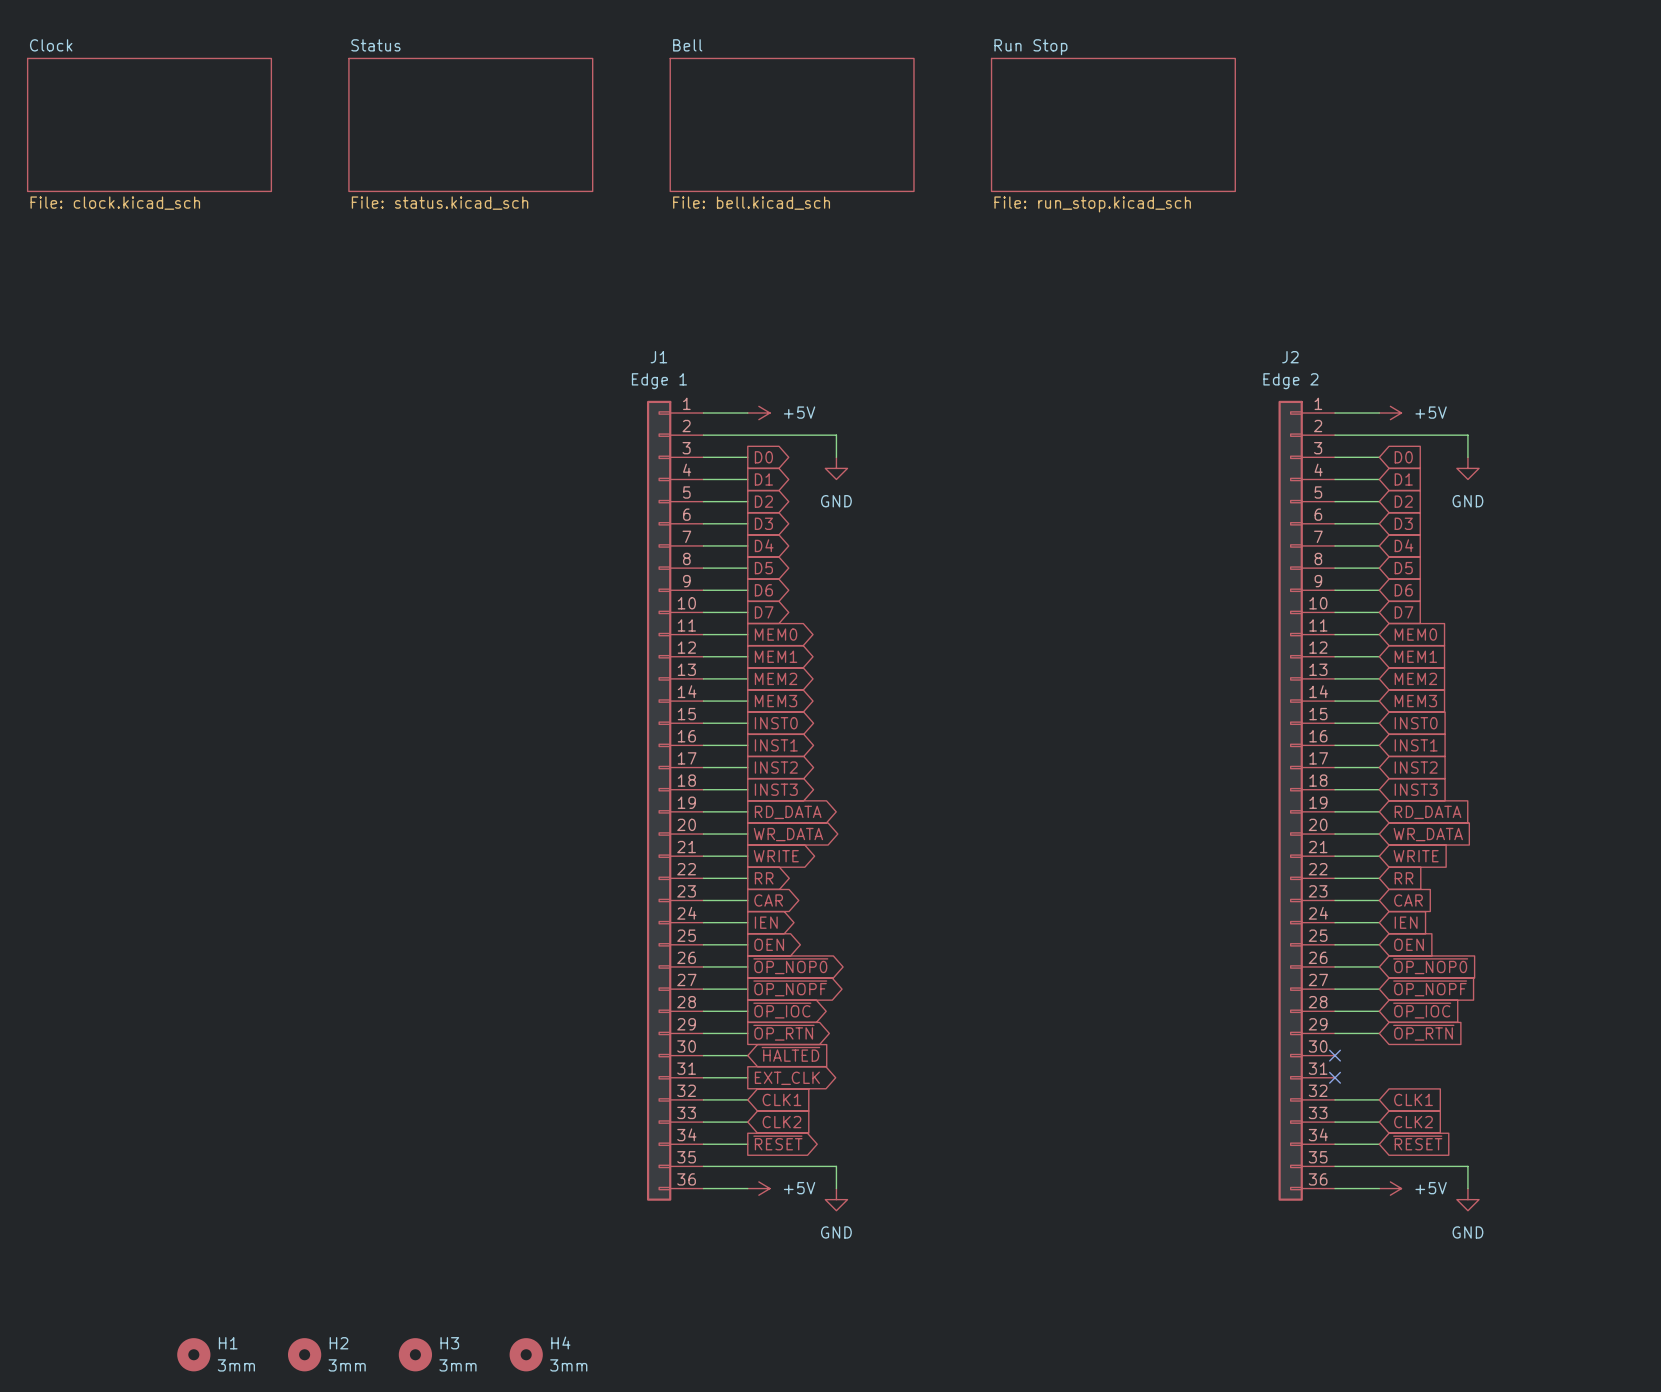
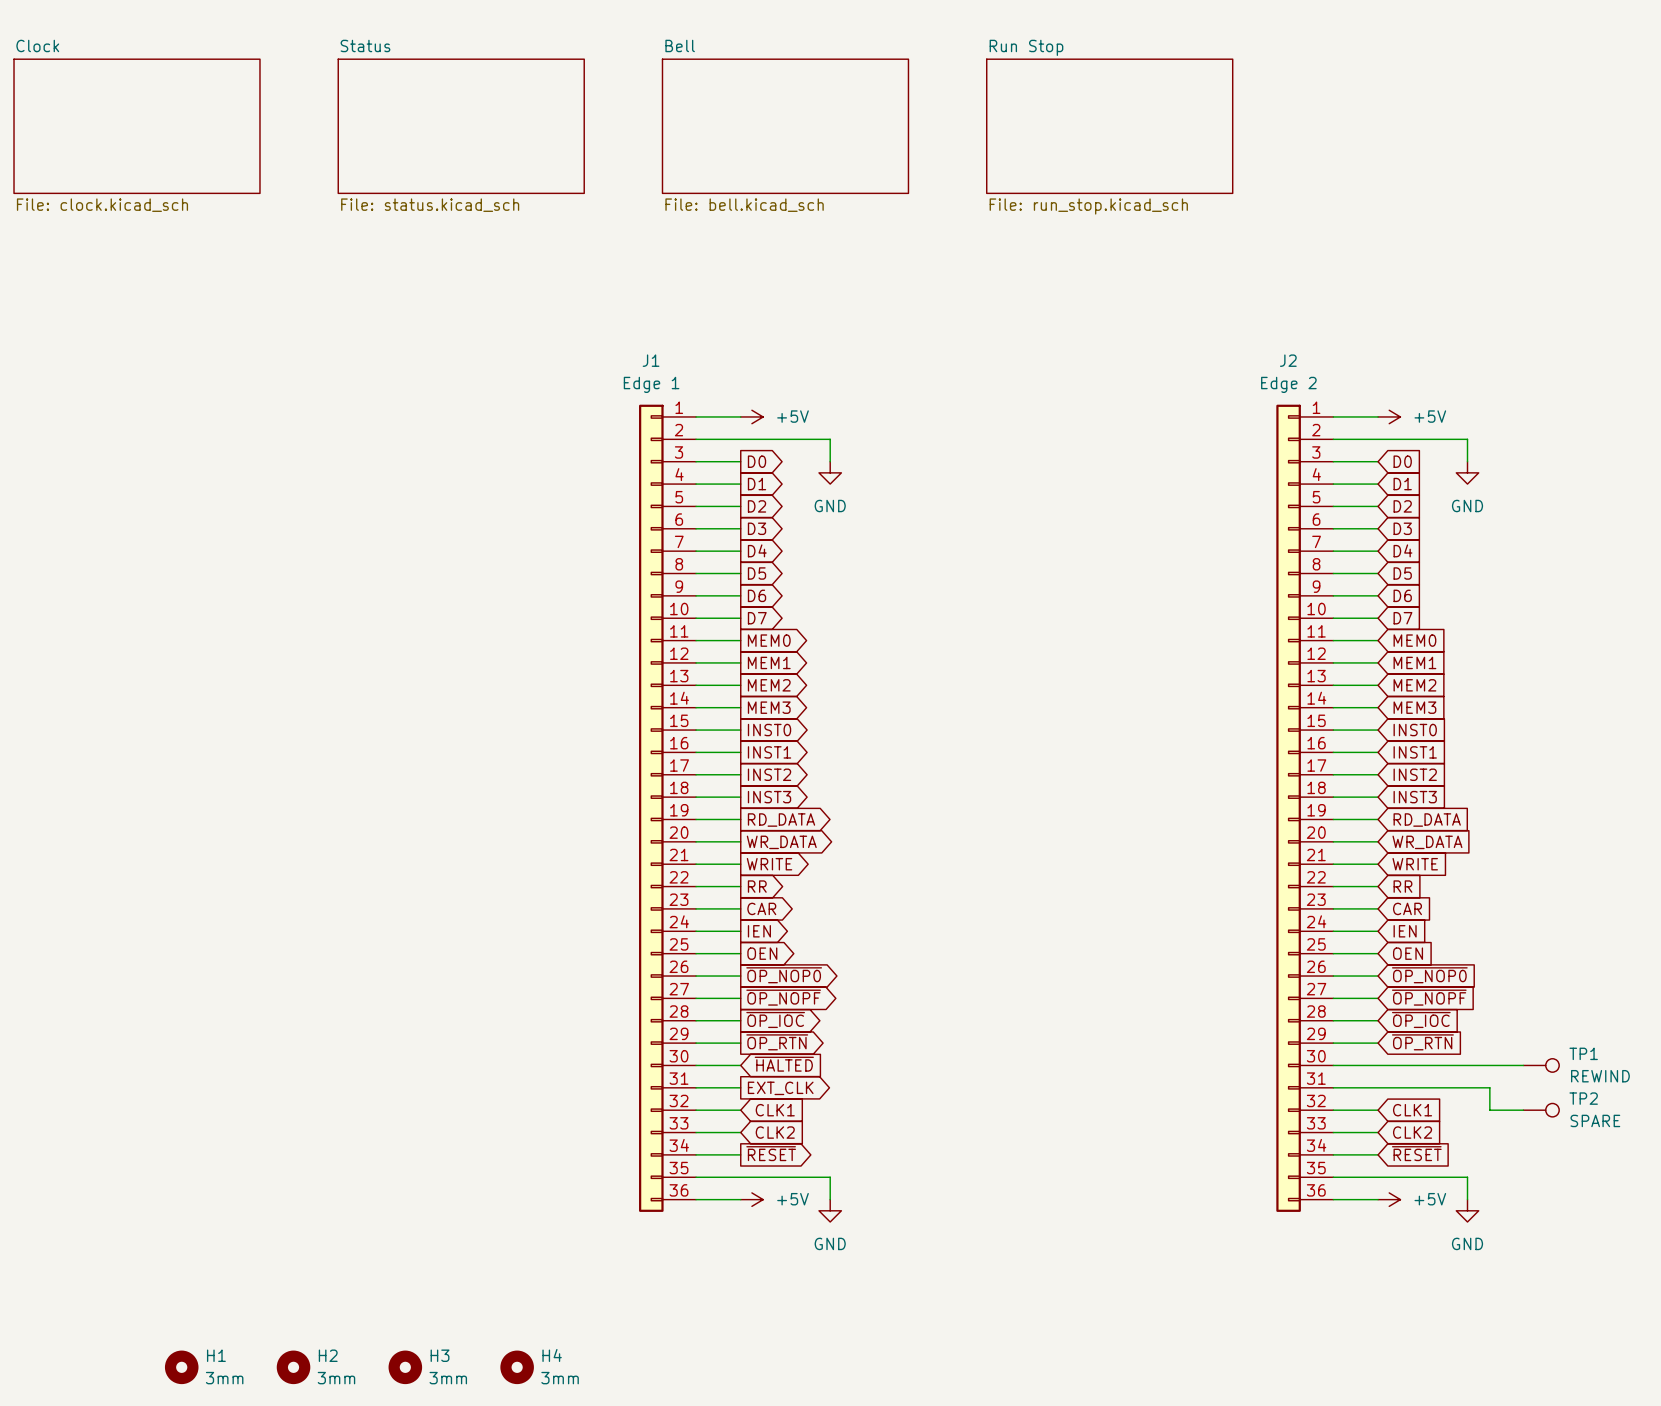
wire: none -> (1333, 1065) (1523, 1065)
no-connect mark: (1335, 1055) -> none
TP1: none -> REWIND (1541, 1065)
wire: none -> (1333, 1087) (1489, 1087) (1489, 1110) (1523, 1110)
no-connect mark: (1335, 1077) -> none
TP2: none -> SPARE (1541, 1110)

